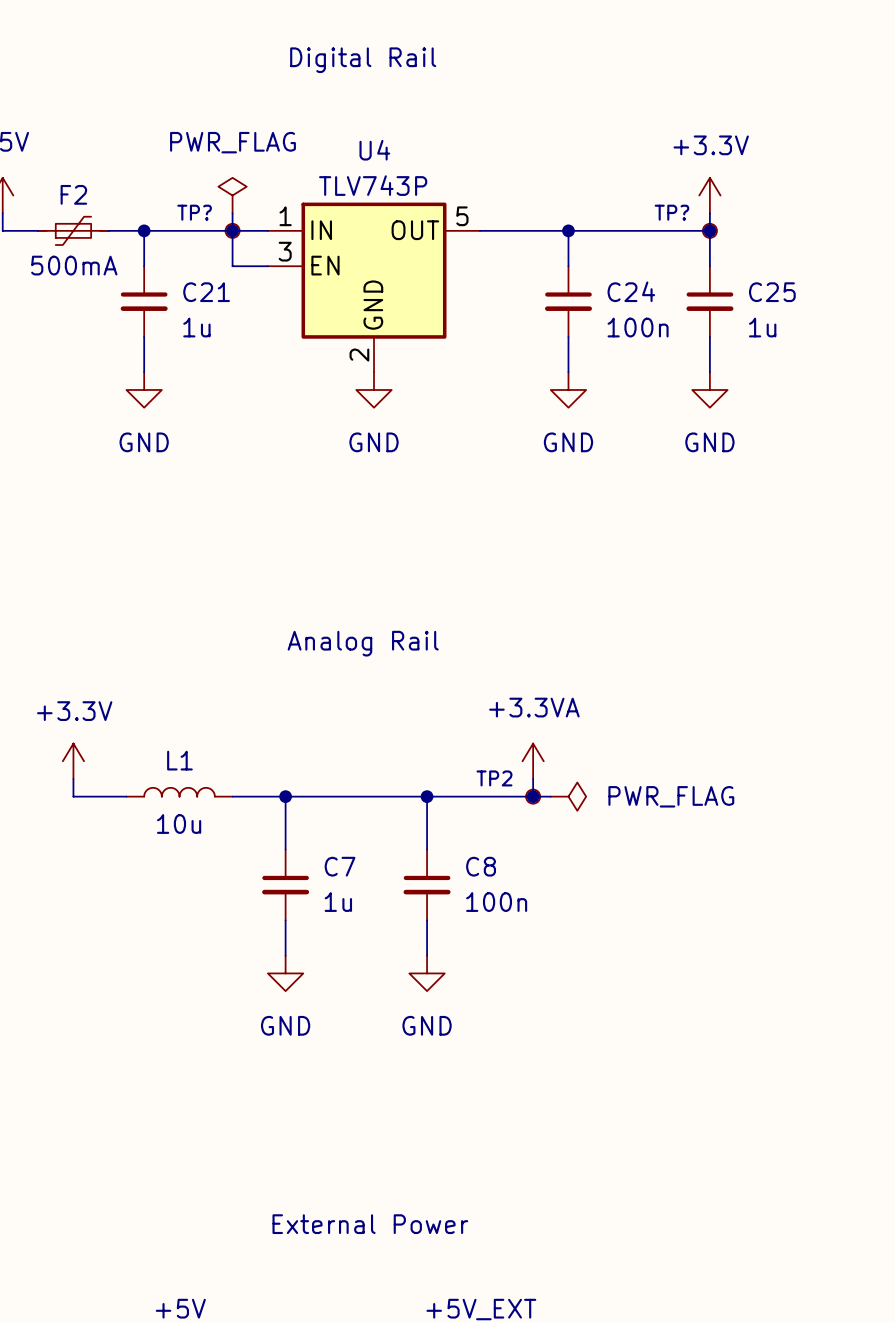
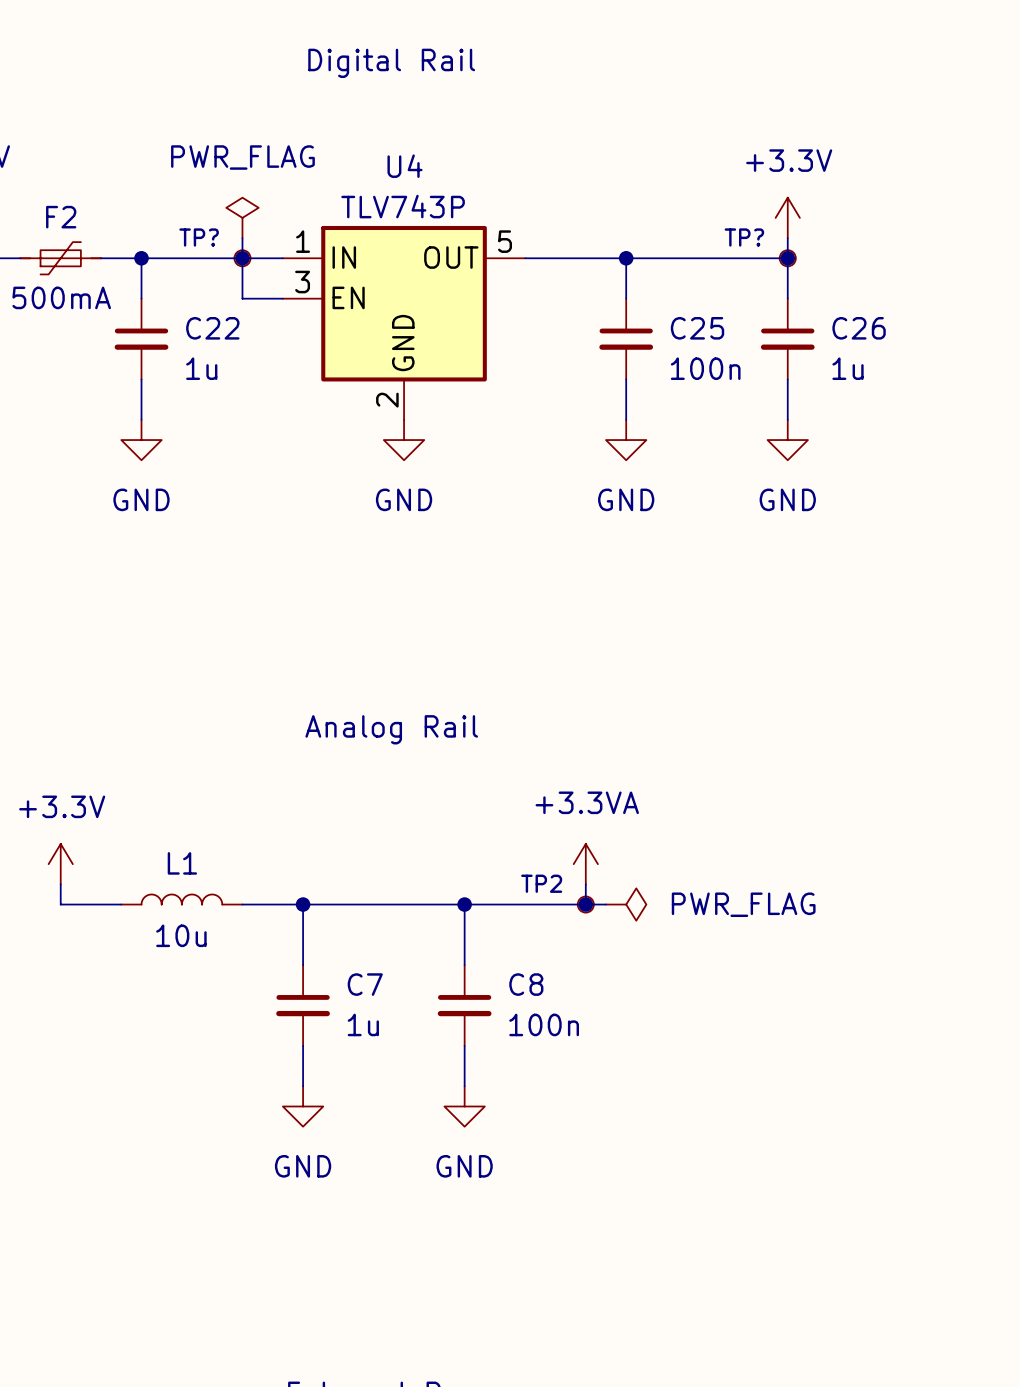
C24 name: C24 (631, 291) -> C25 (697, 328)
C21 name: C21 (206, 292) -> C22 (212, 328)
C25 name: C25 (772, 292) -> C26 (859, 328)

